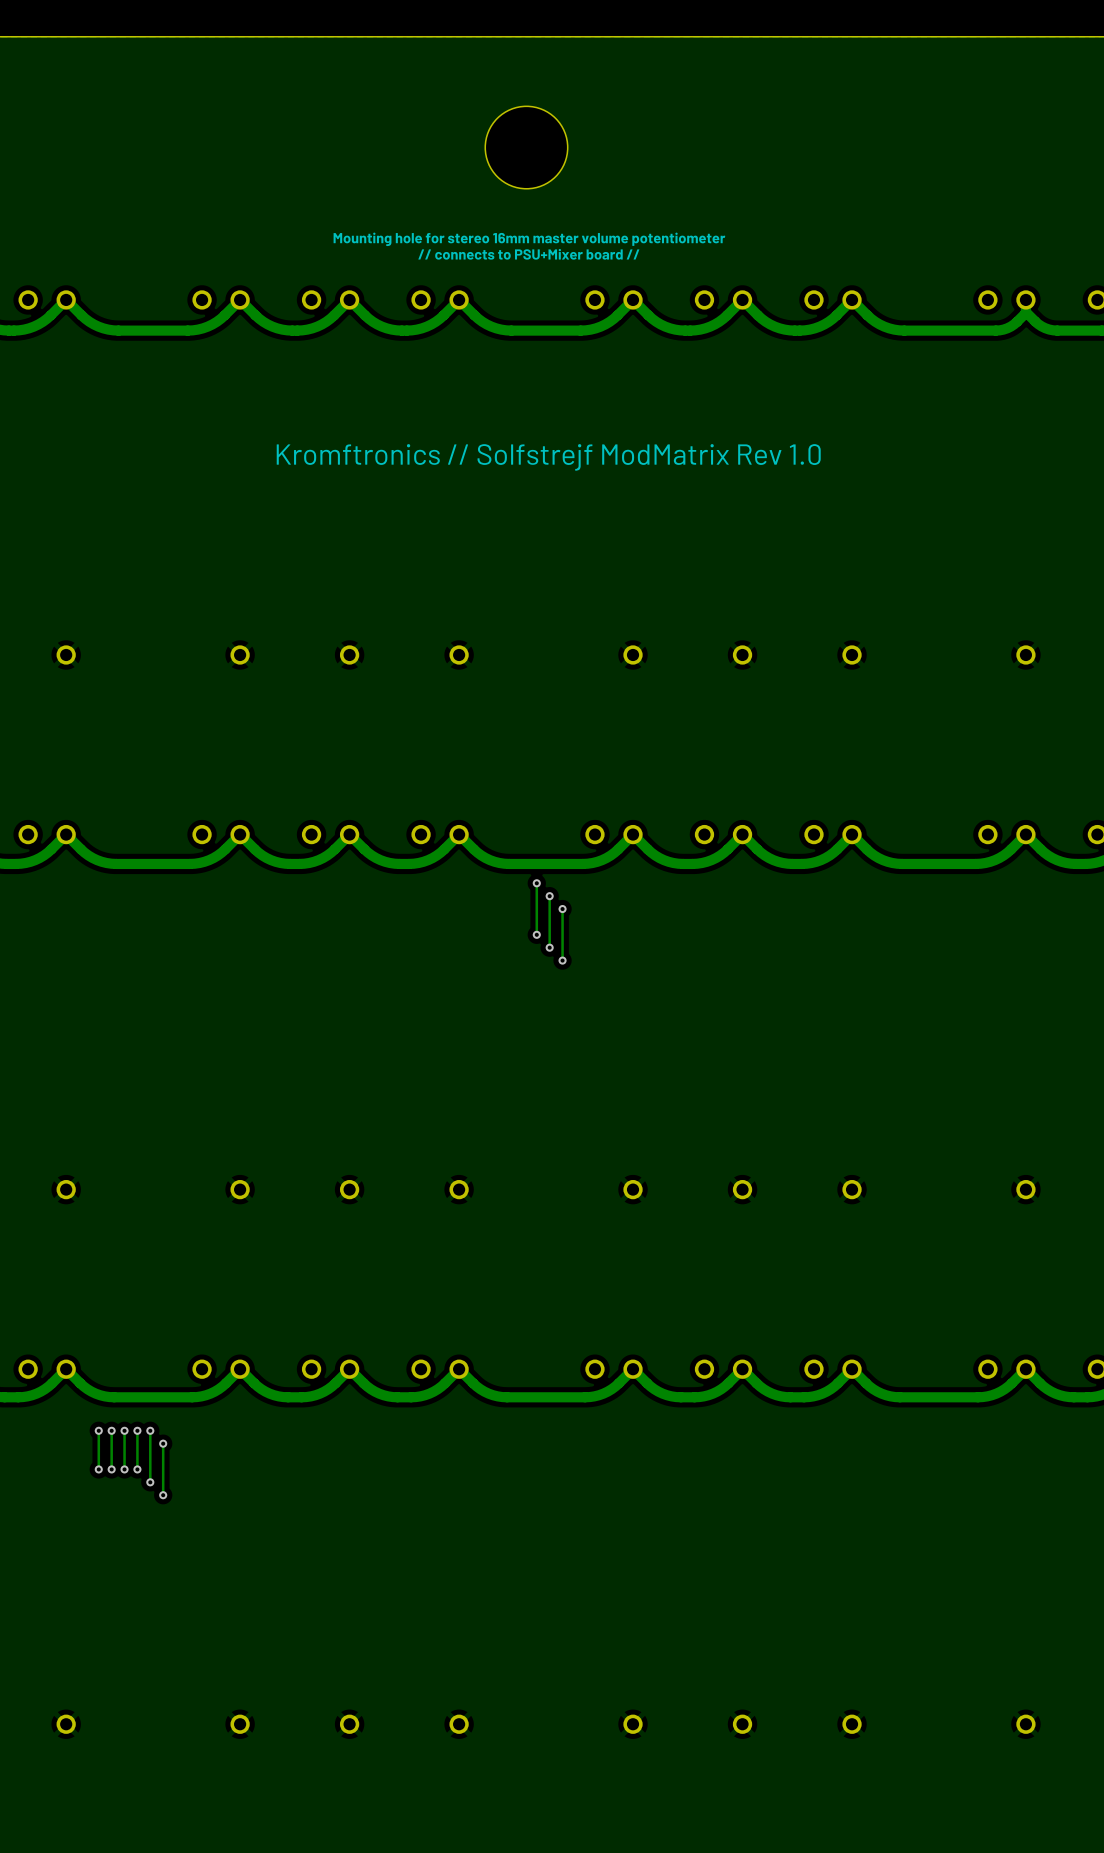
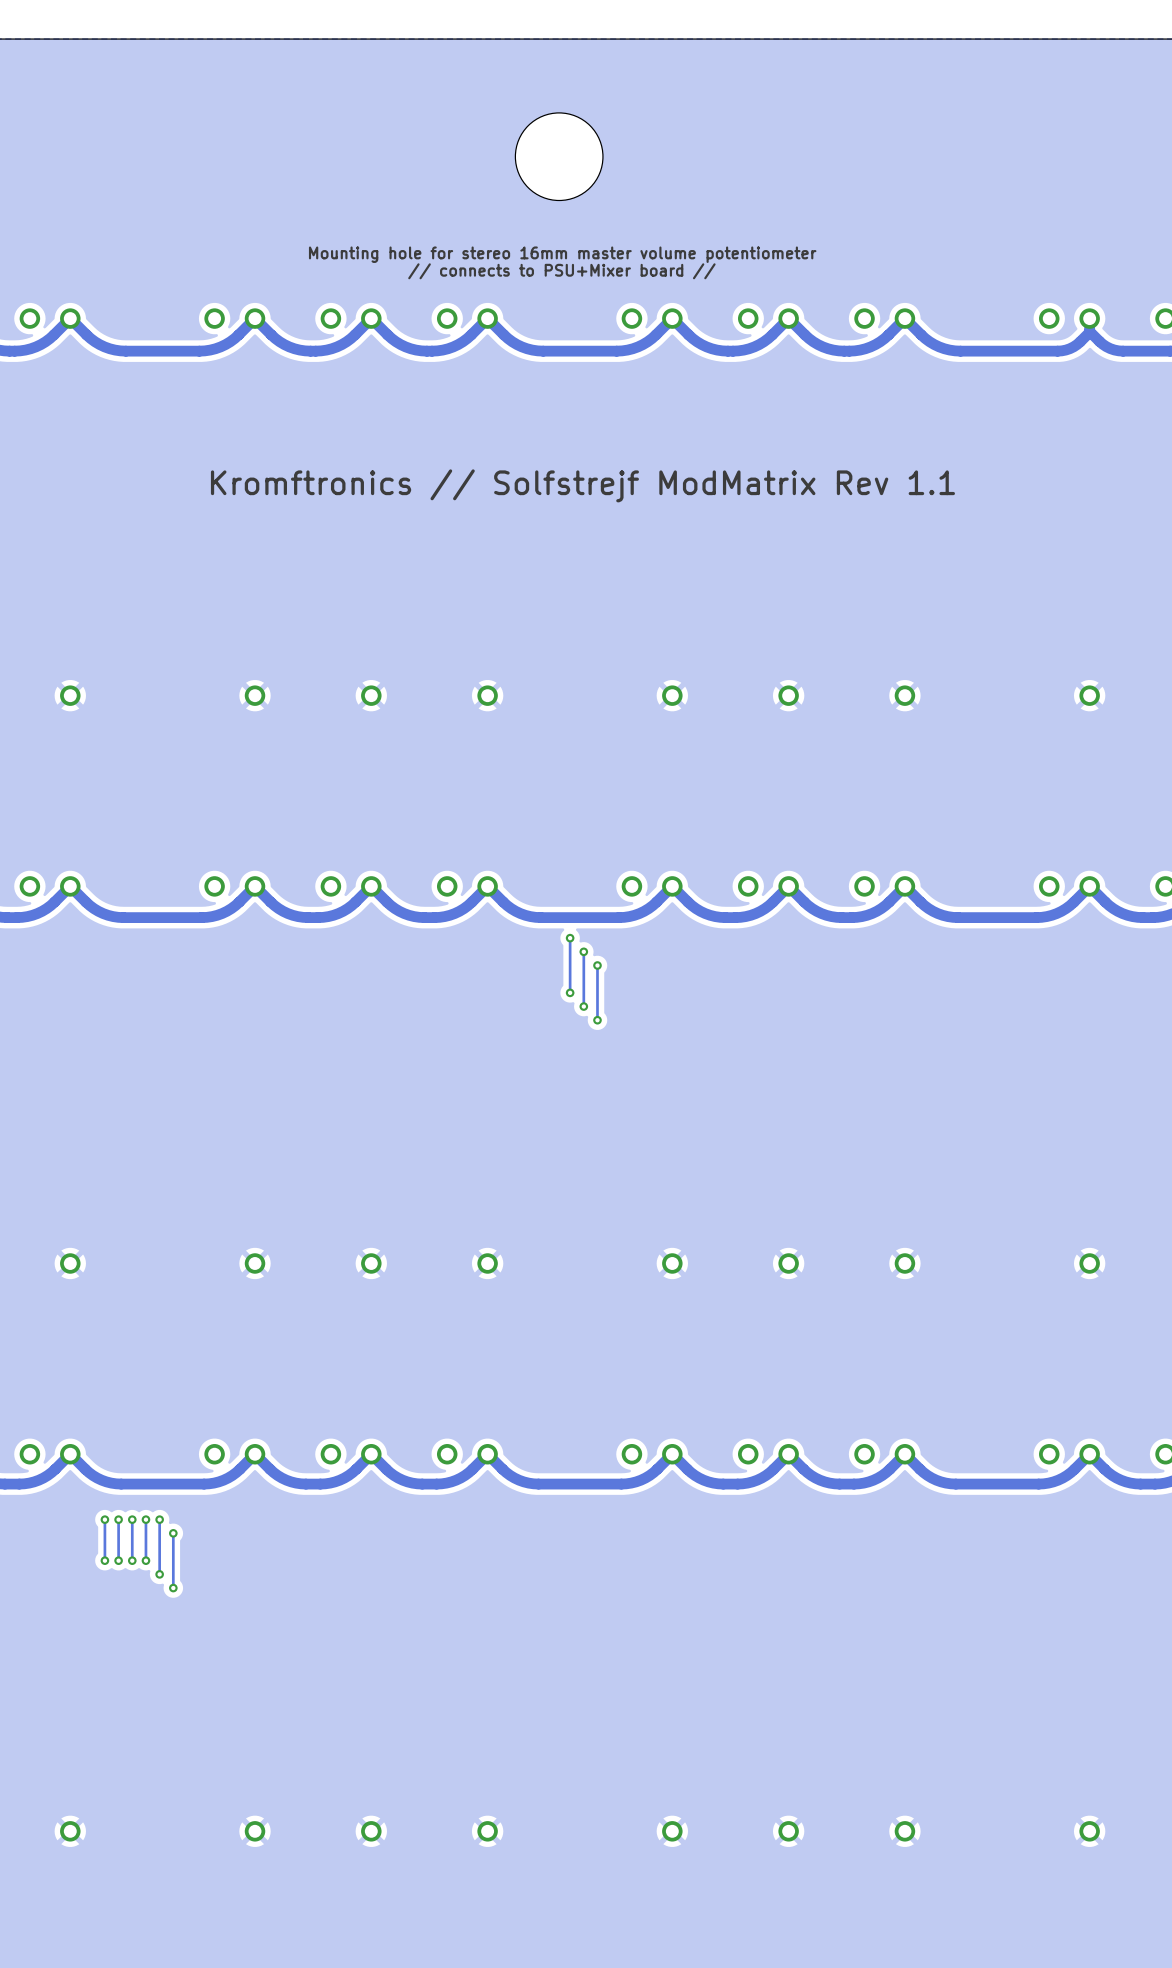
text: Kromftronics // Solfstrejf ModMatrix Rev 1.0 (548, 457) -> Kromftronics // Solfstrejf ModMatrix Rev 1.1 (582, 485)

